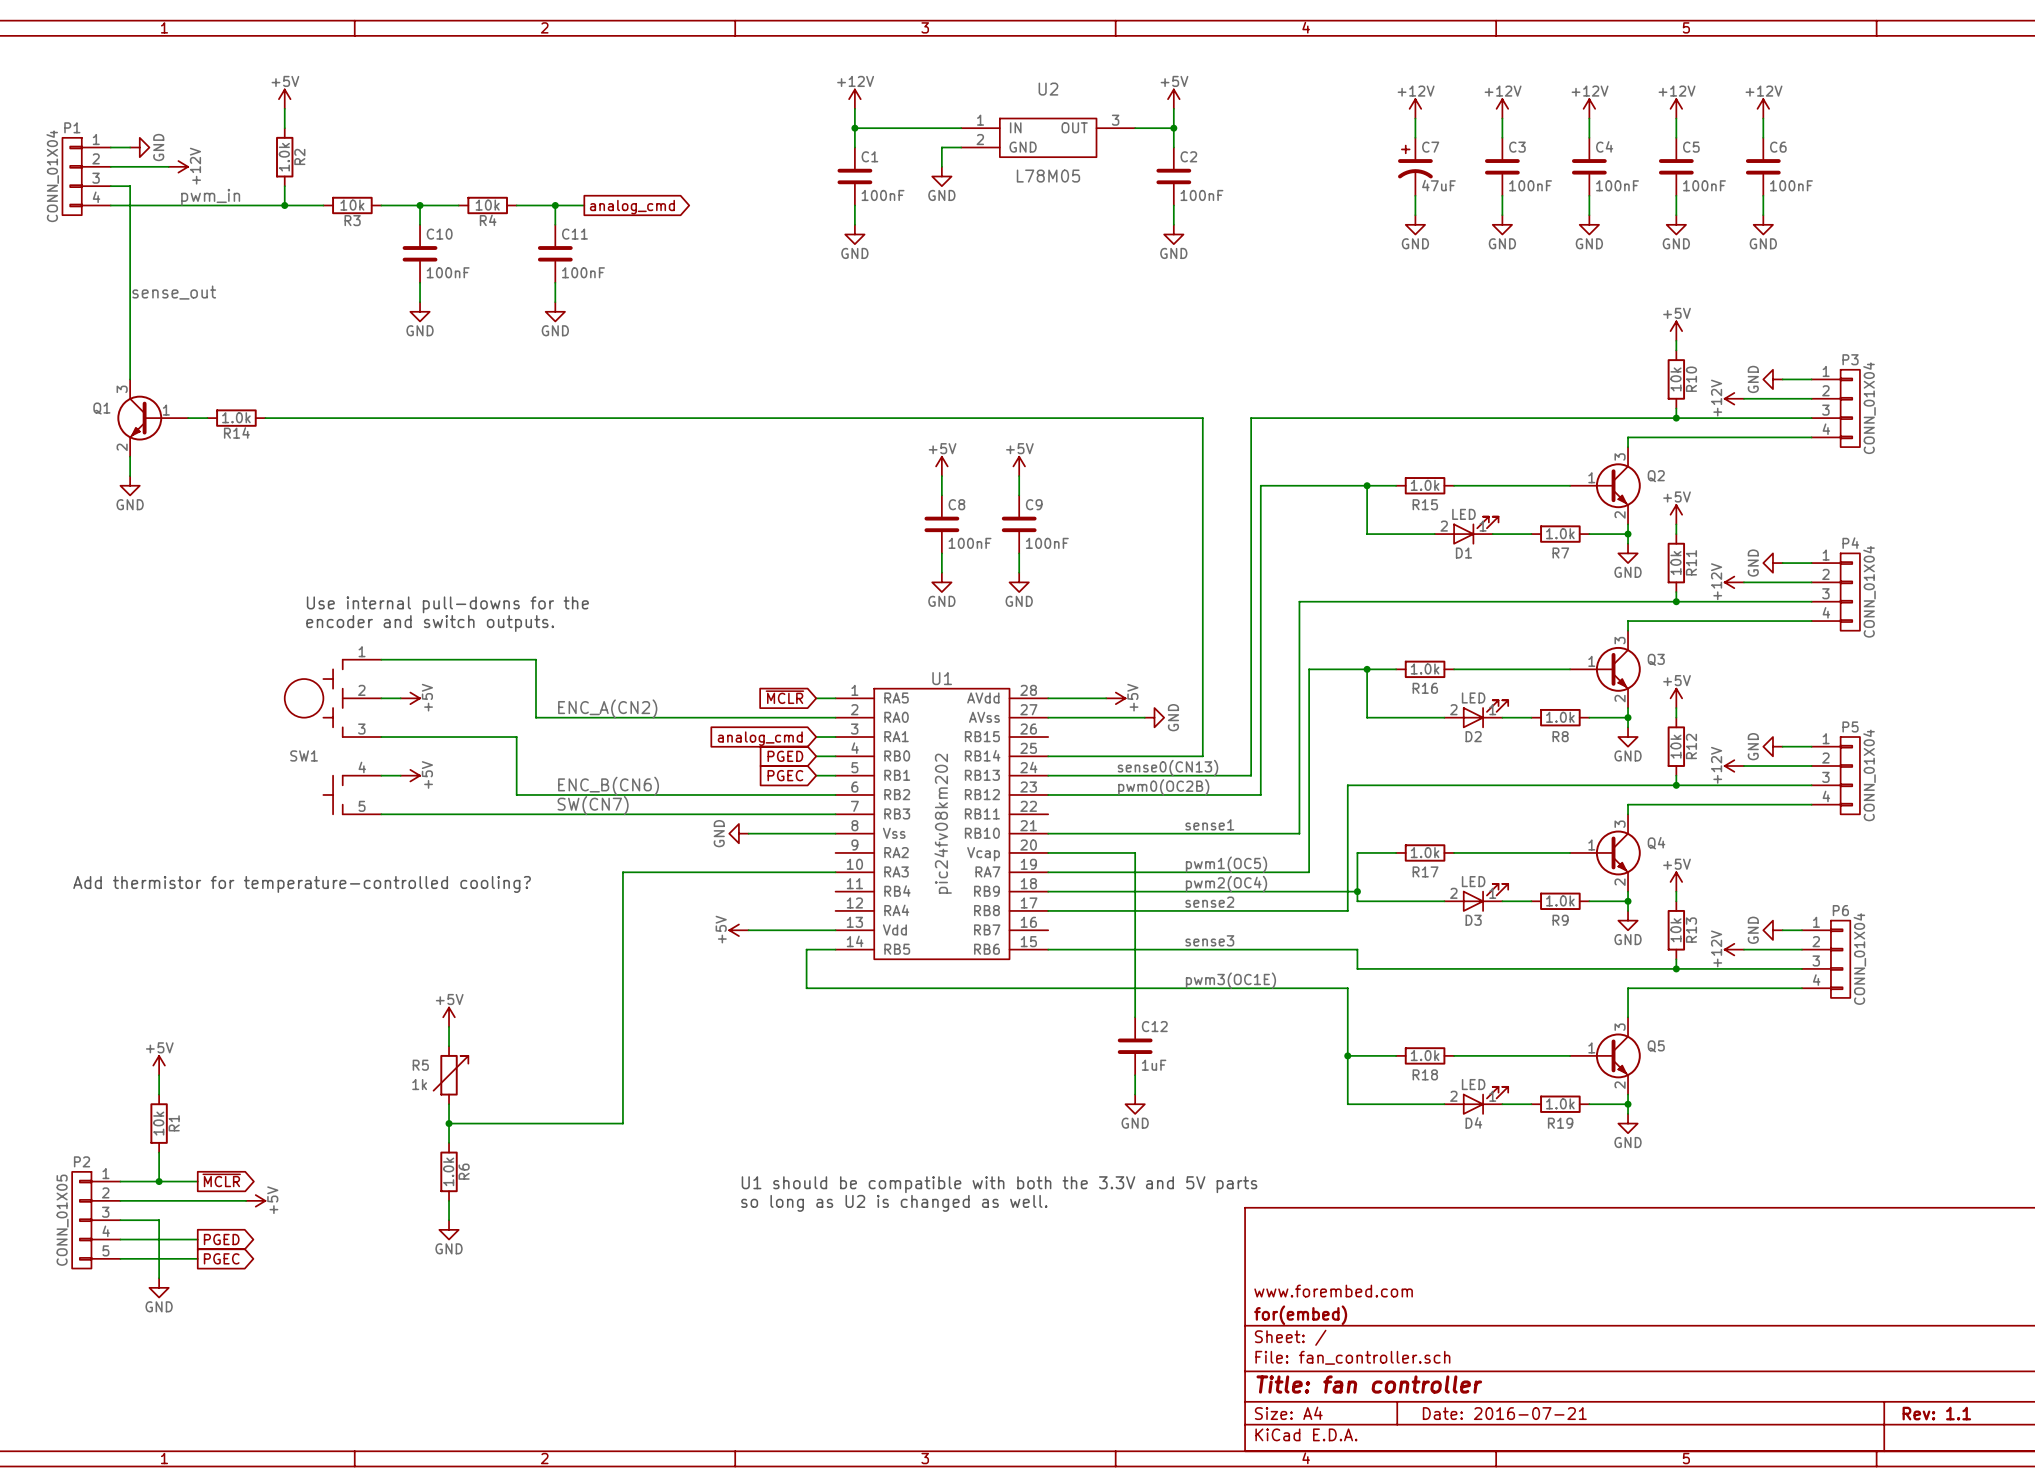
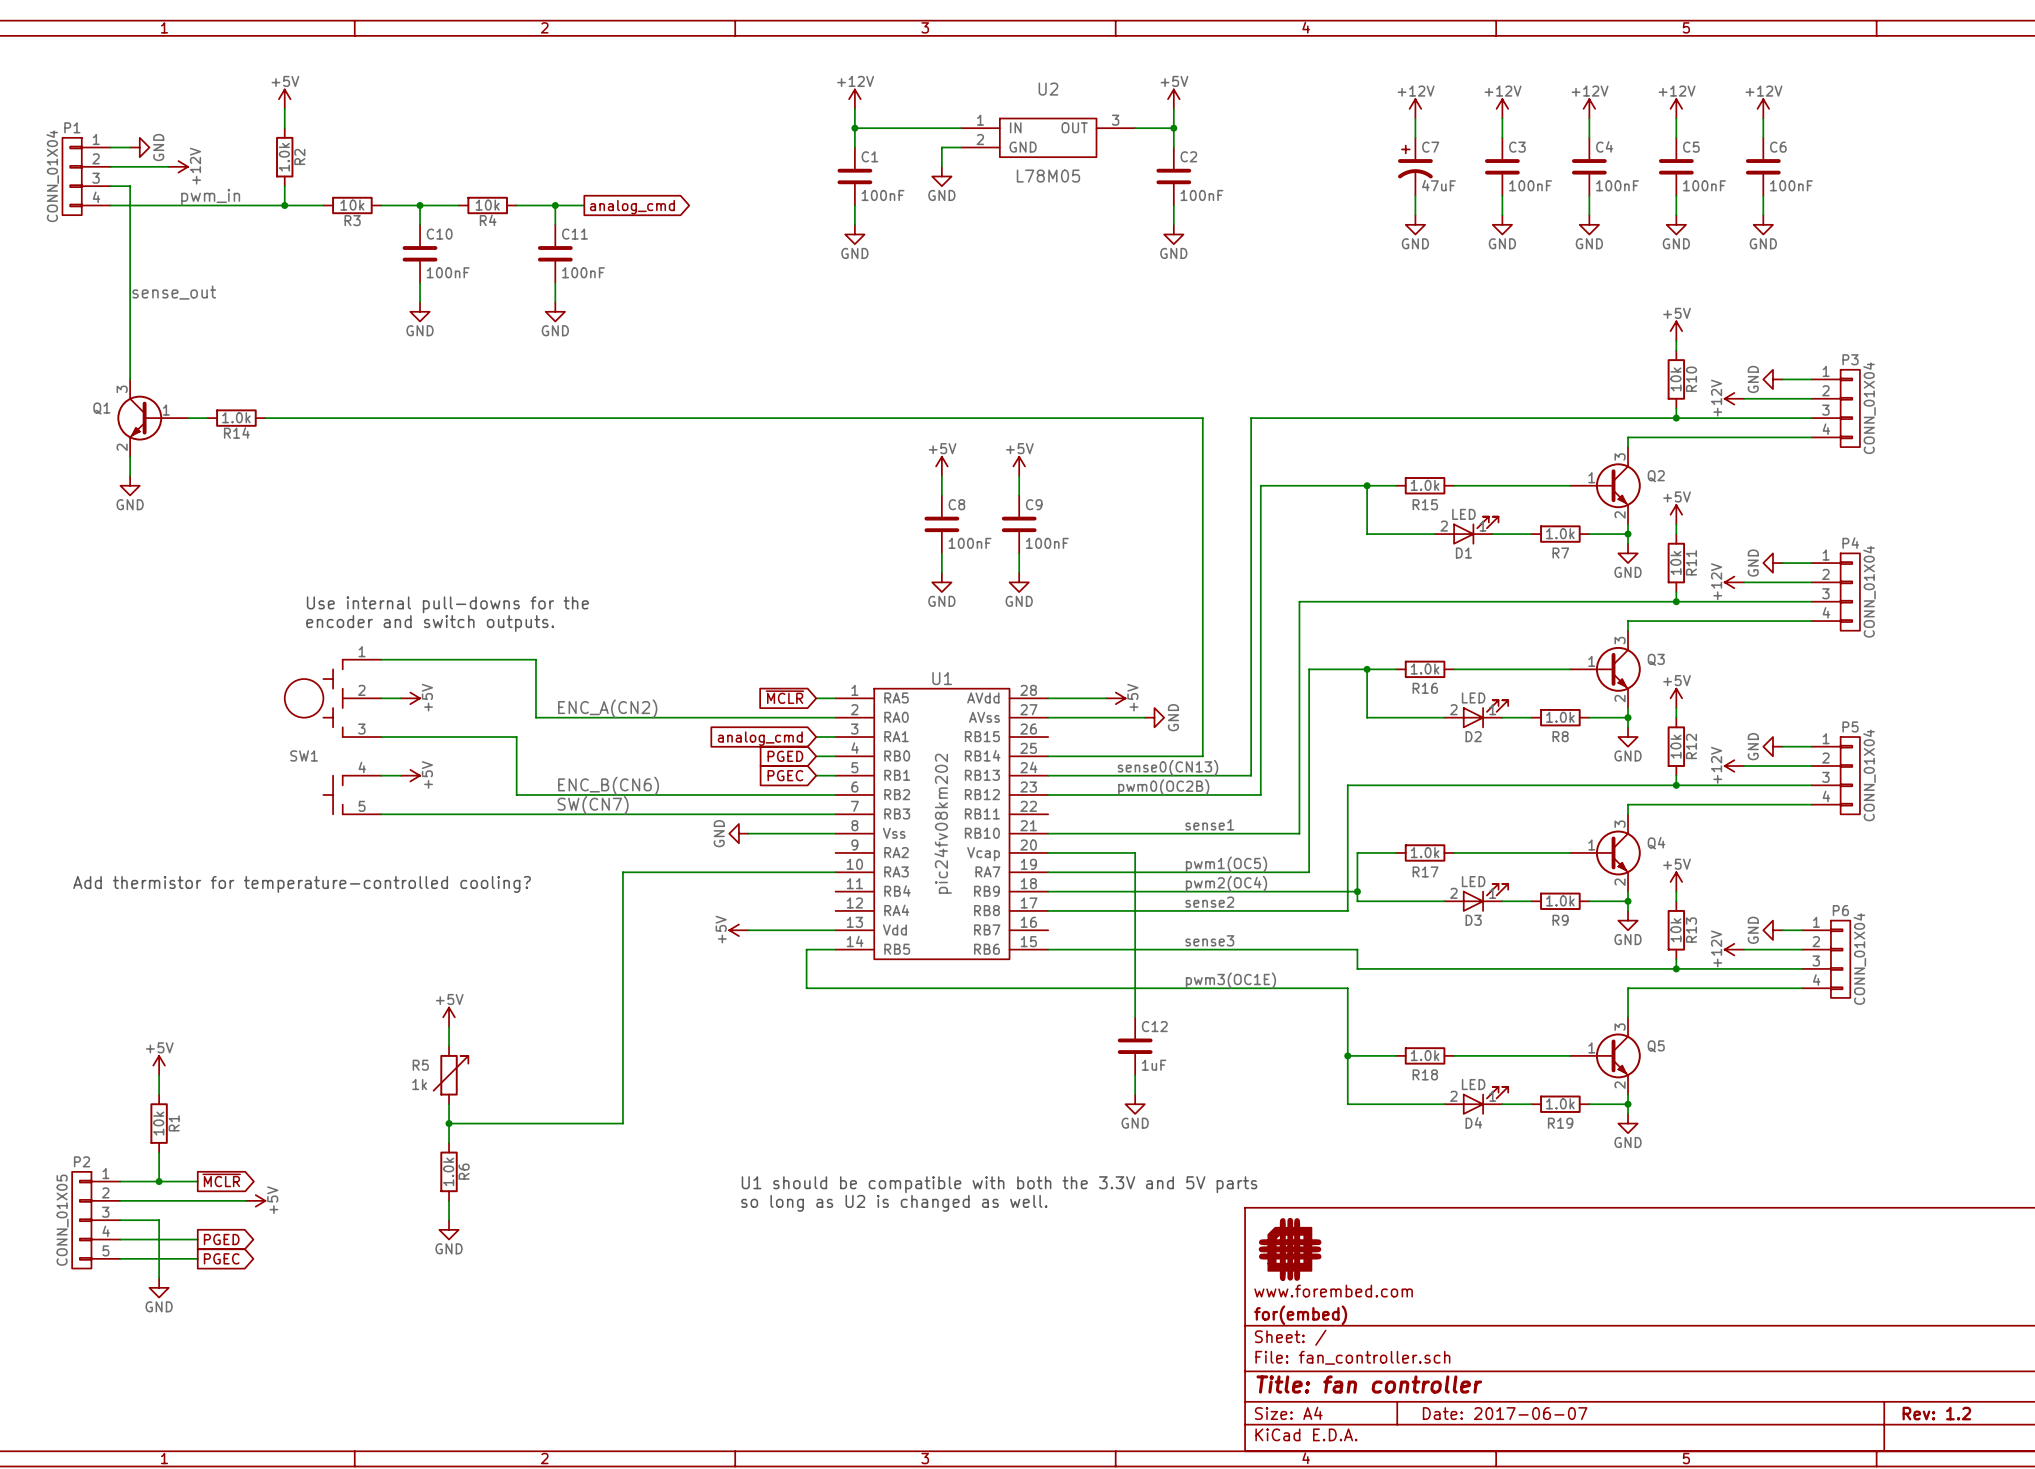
power symbol: none -> (1290, 1249)
title block: Date: 2016-07-21 (1504, 1413) -> Date: 2017-06-07 (1505, 1413)
title block: Rev: 1.1 (1936, 1413) -> Rev: 1.2 (1936, 1413)

